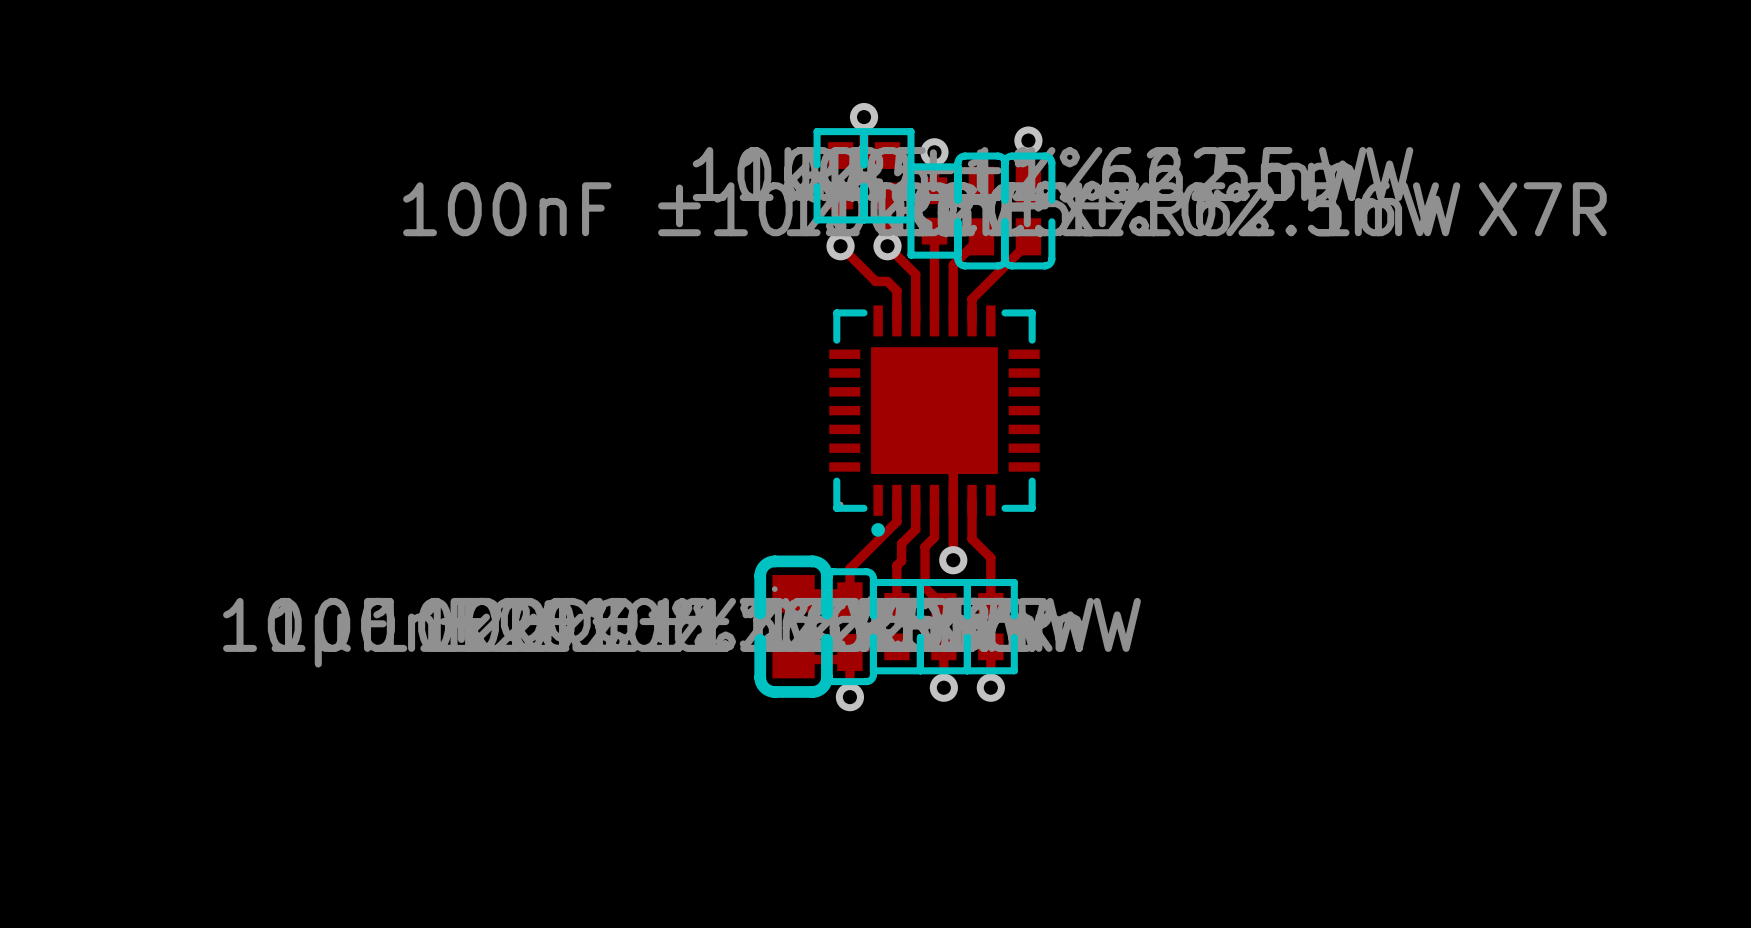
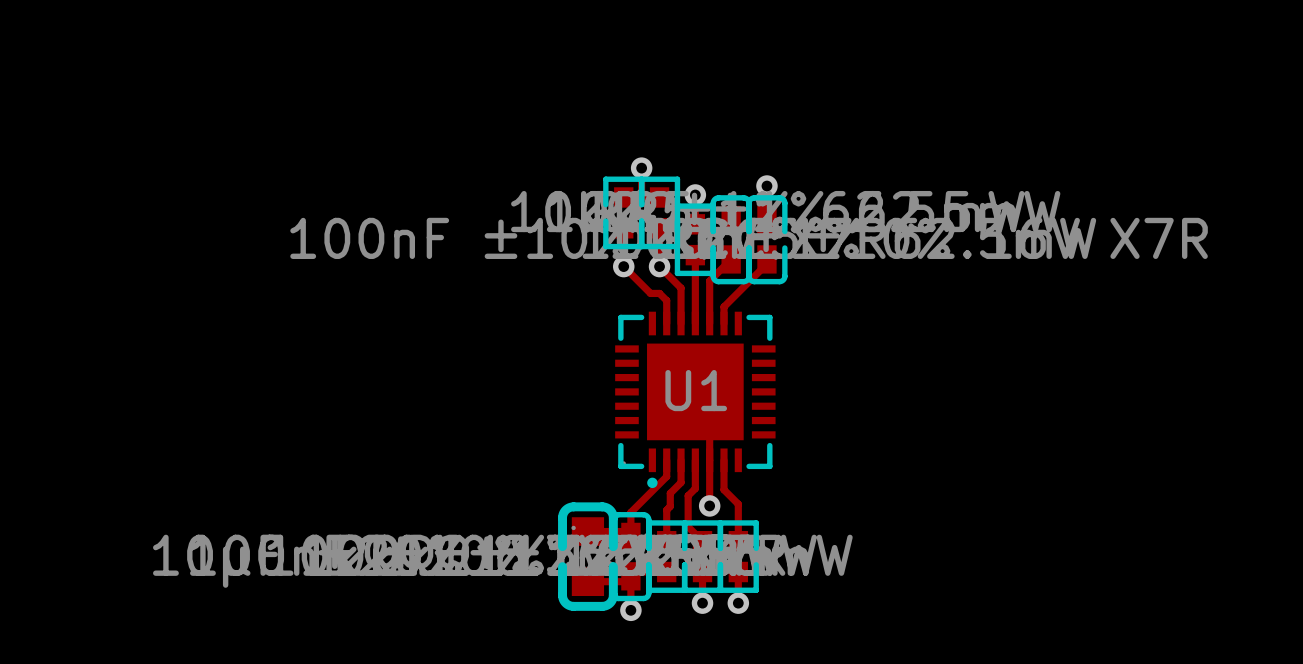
U1 name: none -> U1 (696, 390)

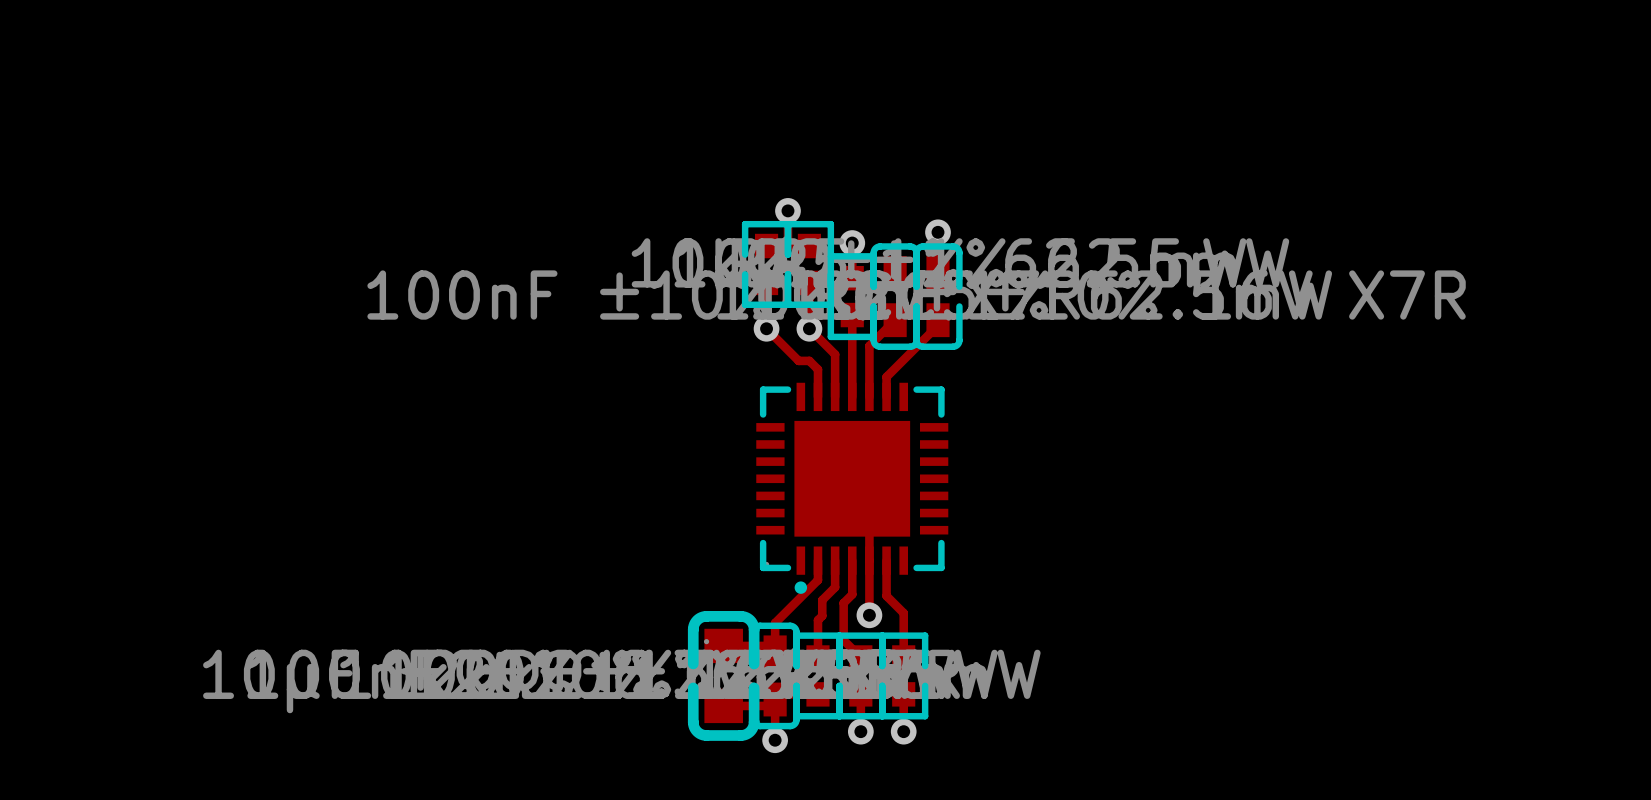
U1 name: U1 (696, 390) -> none

